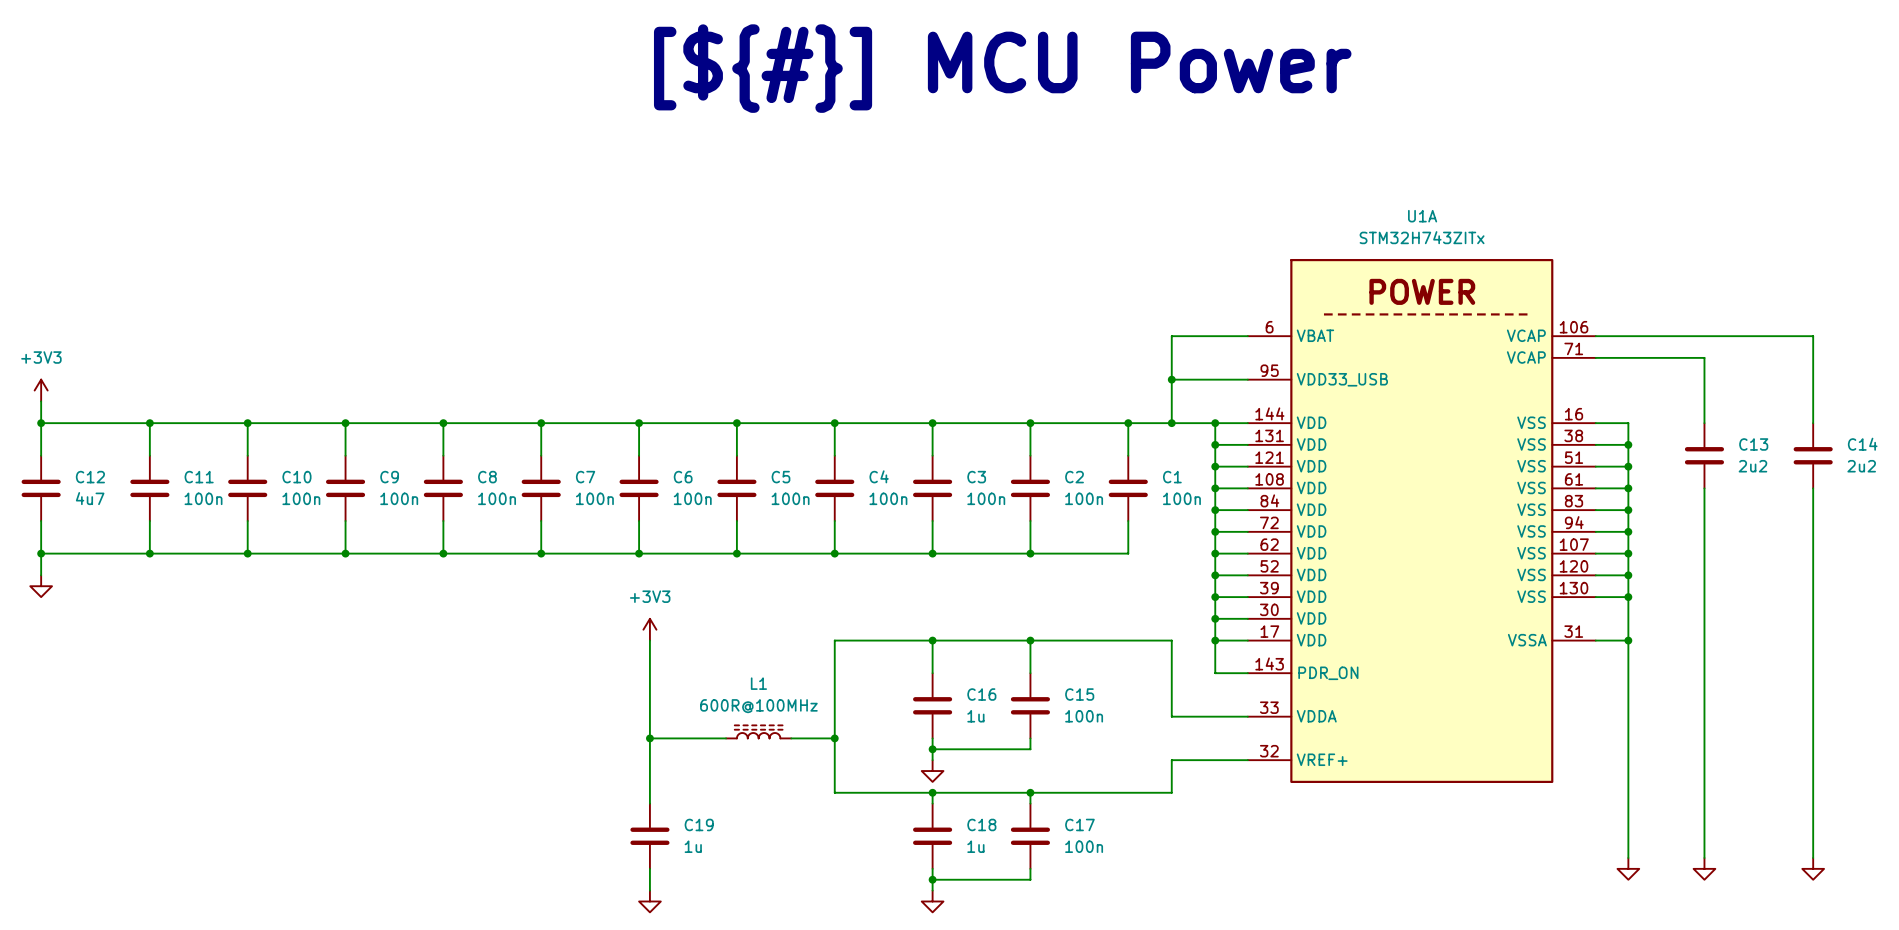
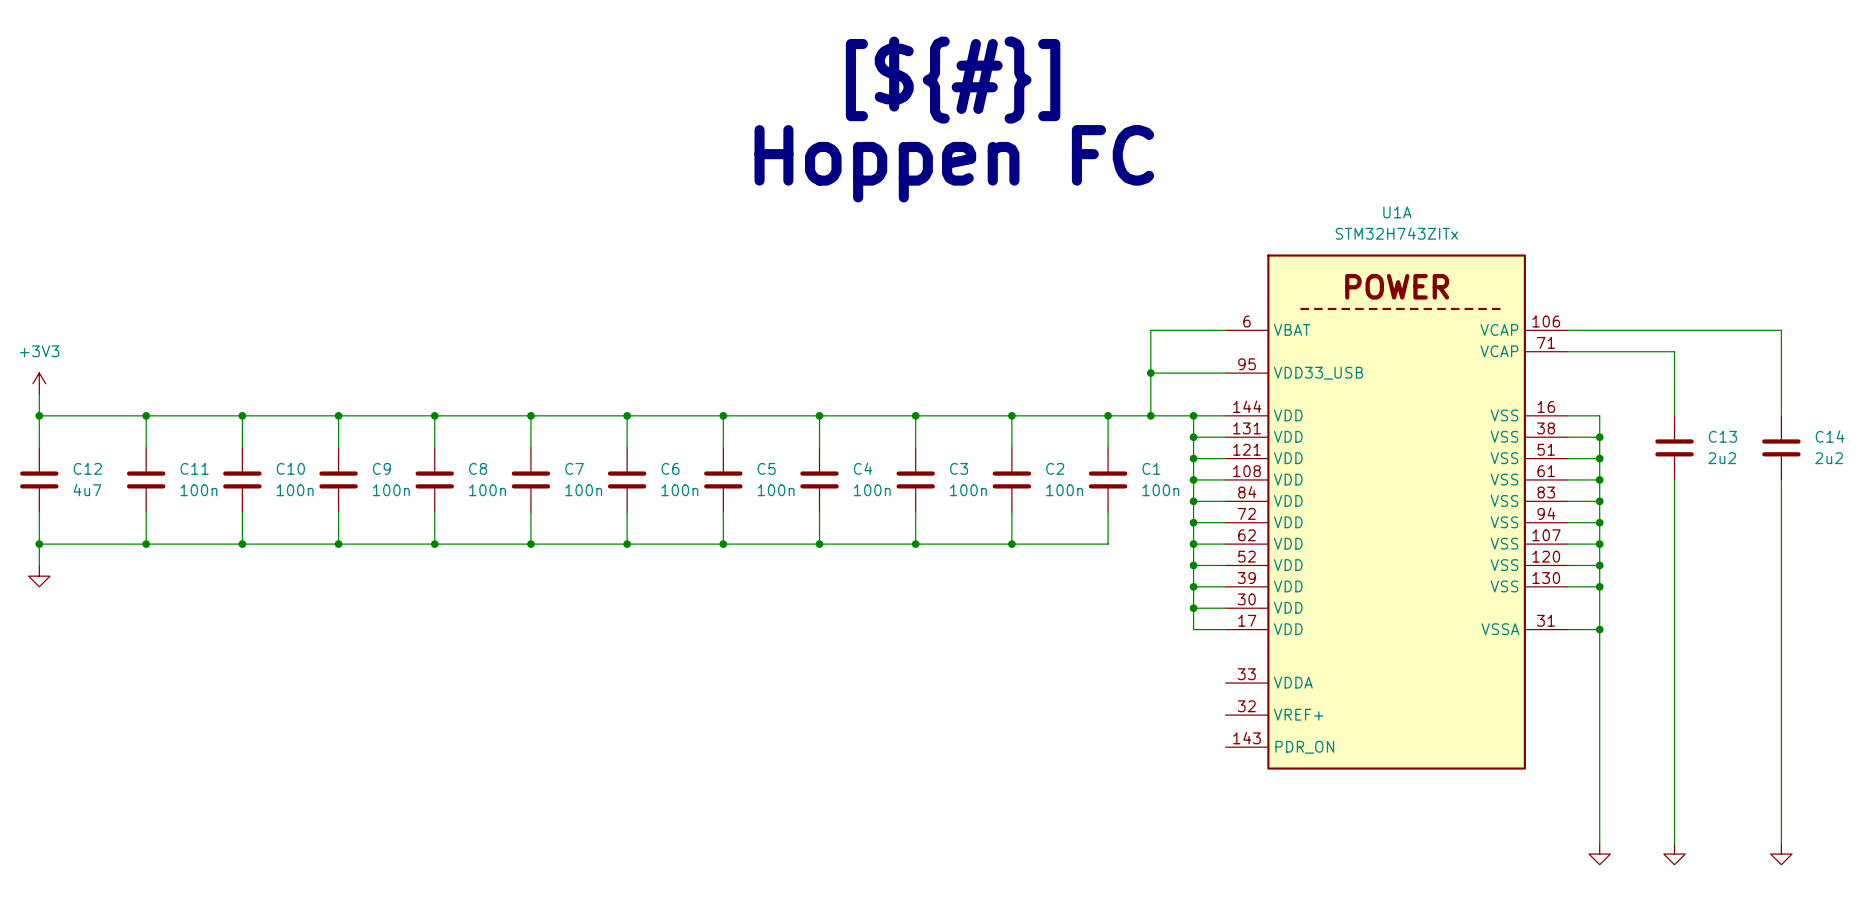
text: [${#}] MCU Power (1002, 68) -> none
text: none -> [${#}] (953, 80)
text: none -> Hoppen FC (954, 163)
U1A symbol: [1247, 258, 1596, 783] -> [1225, 254, 1568, 770]
power symbol: +3V3 (649, 629) -> none
wire: (649, 640) (649, 803) -> none
wire: (932, 640) (932, 673) -> none
junction: (932, 640) -> none
wire: (1030, 640) (1030, 673) -> none
junction: (1030, 640) -> none
wire: (1215, 640) (1215, 673) (1247, 673) -> none
junction: (1215, 640) -> none
C16: 1u (932, 705) -> none
C15: 100n (1030, 705) -> none
wire: (1247, 716) (1171, 716) (1171, 640) (834, 640) (834, 792) (1171, 792) (1171, 760) (1247, 760) -> none
L1: 600R@100MHz (758, 731) -> none
wire: (649, 738) (726, 738) -> none
junction: (649, 738) -> none
wire: (791, 738) (834, 738) -> none
junction: (834, 738) -> none
wire: (932, 738) (932, 760) -> none
wire: (1030, 738) (1030, 749) (932, 749) -> none
junction: (932, 749) -> none
power symbol: (932, 771) -> none
wire: (932, 792) (932, 803) -> none
junction: (932, 792) -> none
wire: (1030, 792) (1030, 803) -> none
junction: (1030, 792) -> none
C19: 1u (649, 836) -> none
C18: 1u (932, 836) -> none
C17: 100n (1030, 836) -> none
wire: (649, 868) (649, 890) -> none
wire: (932, 868) (932, 890) -> none
wire: (1030, 868) (1030, 879) (932, 879) -> none
junction: (932, 879) -> none
power symbol: (649, 901) -> none
power symbol: (932, 901) -> none

